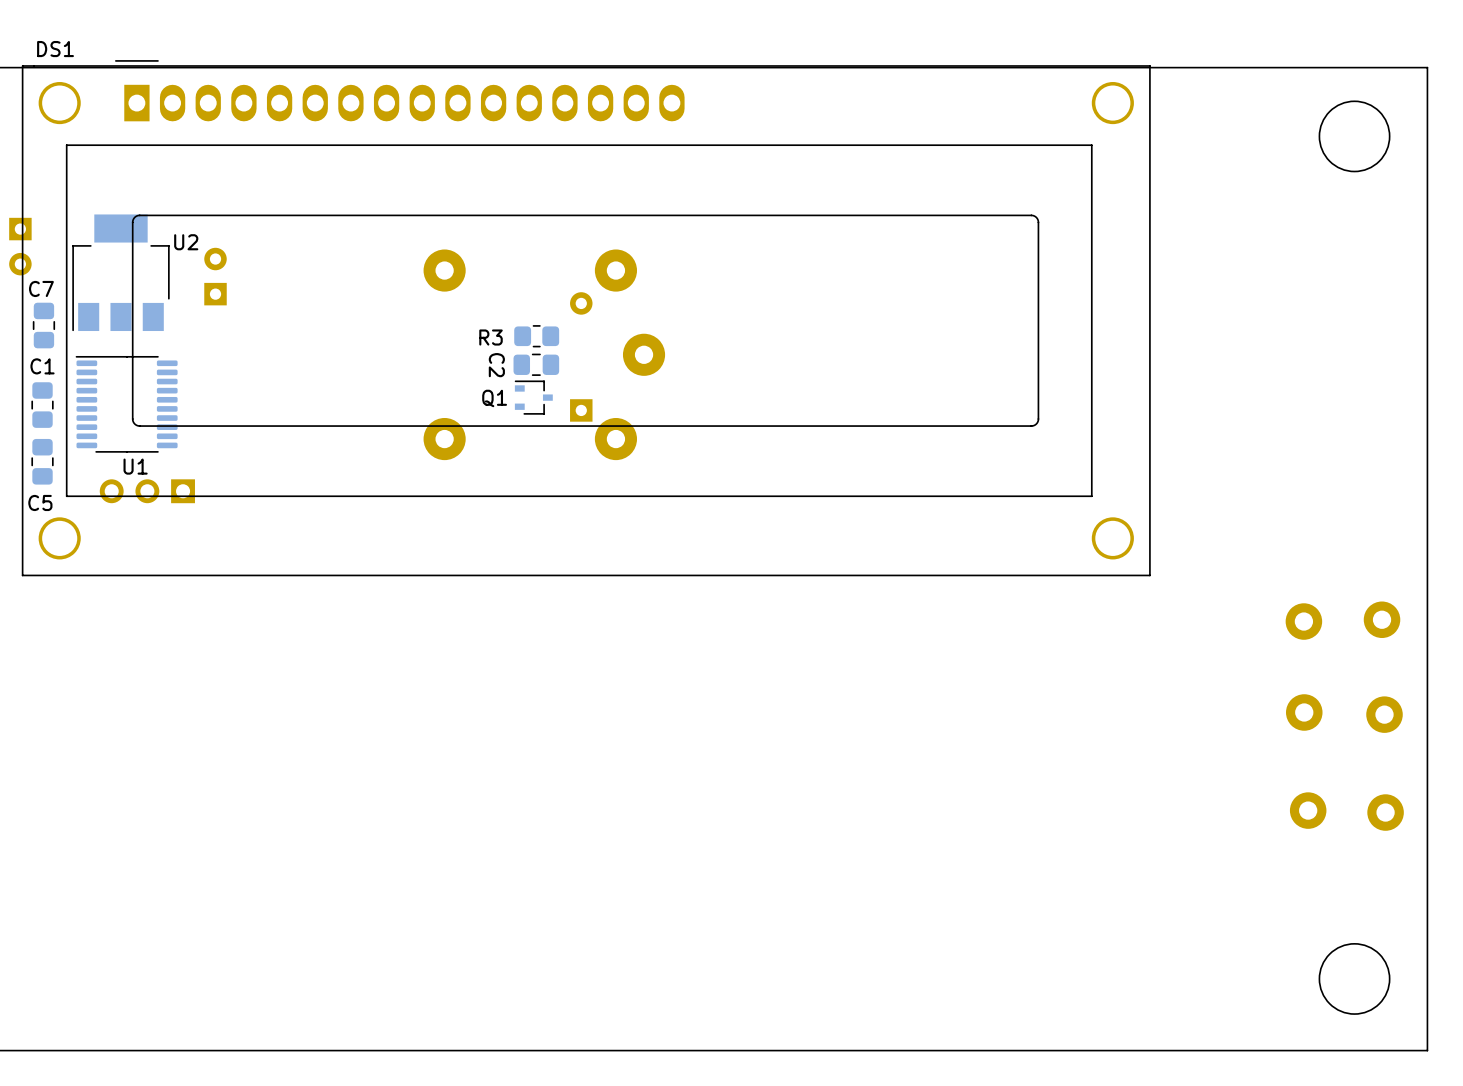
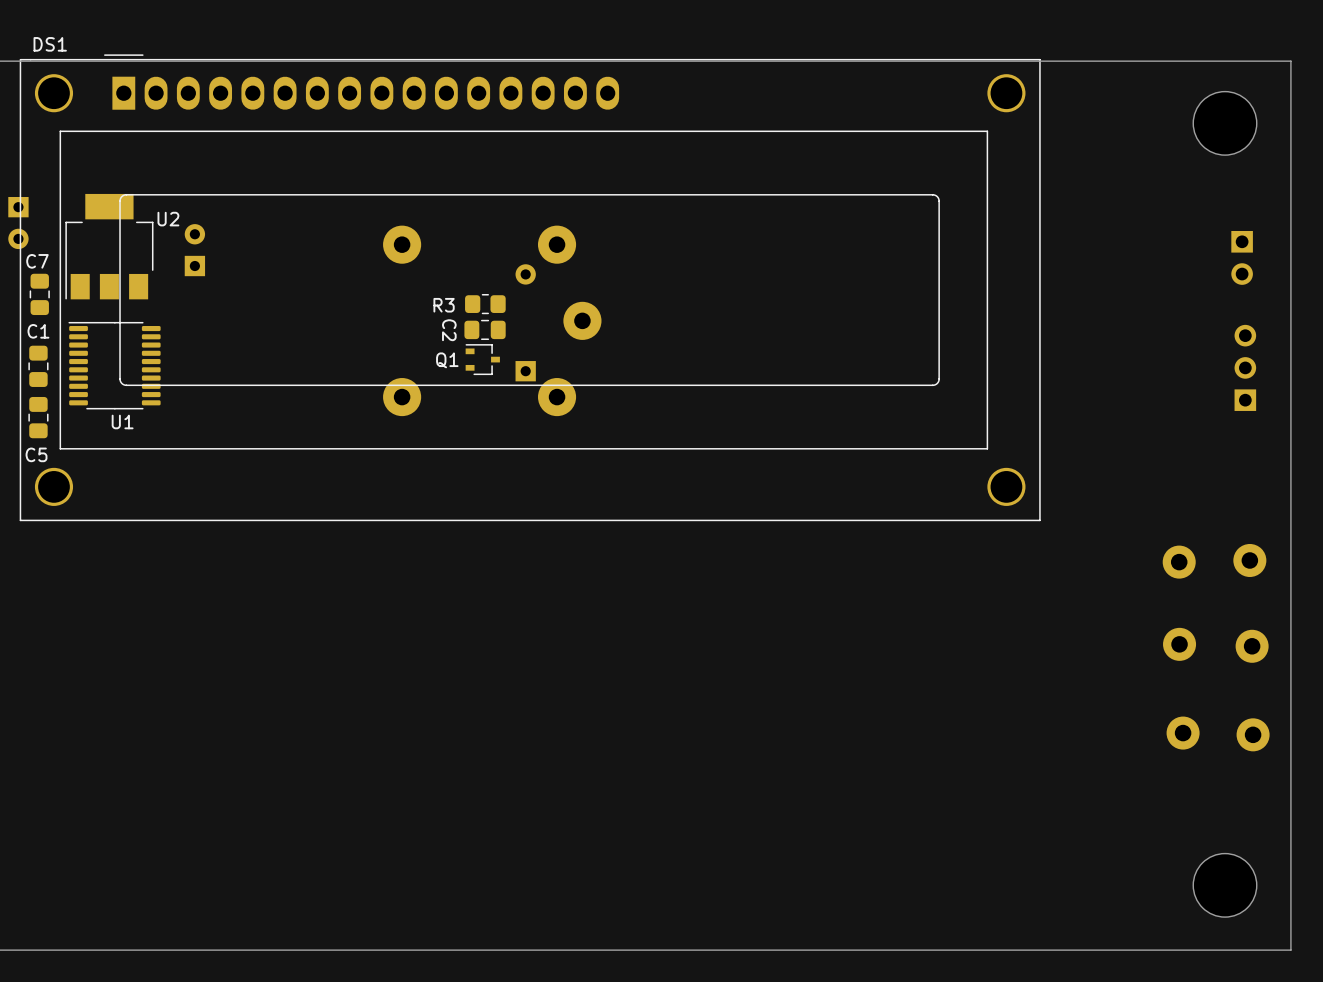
part: none -> (1242, 257)
part: none -> (1245, 367)
part: (147, 491) -> none

